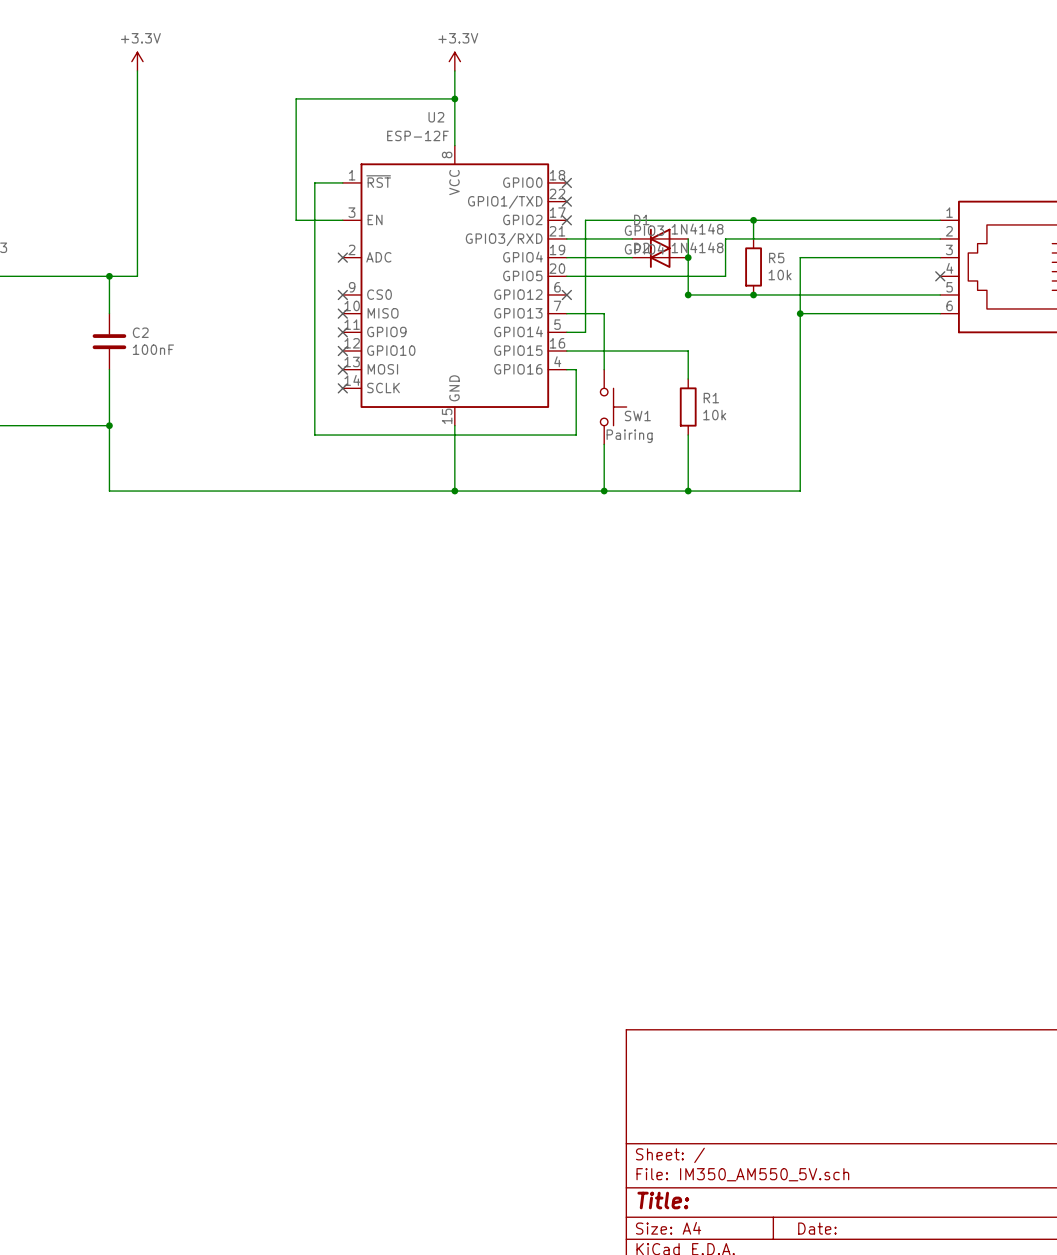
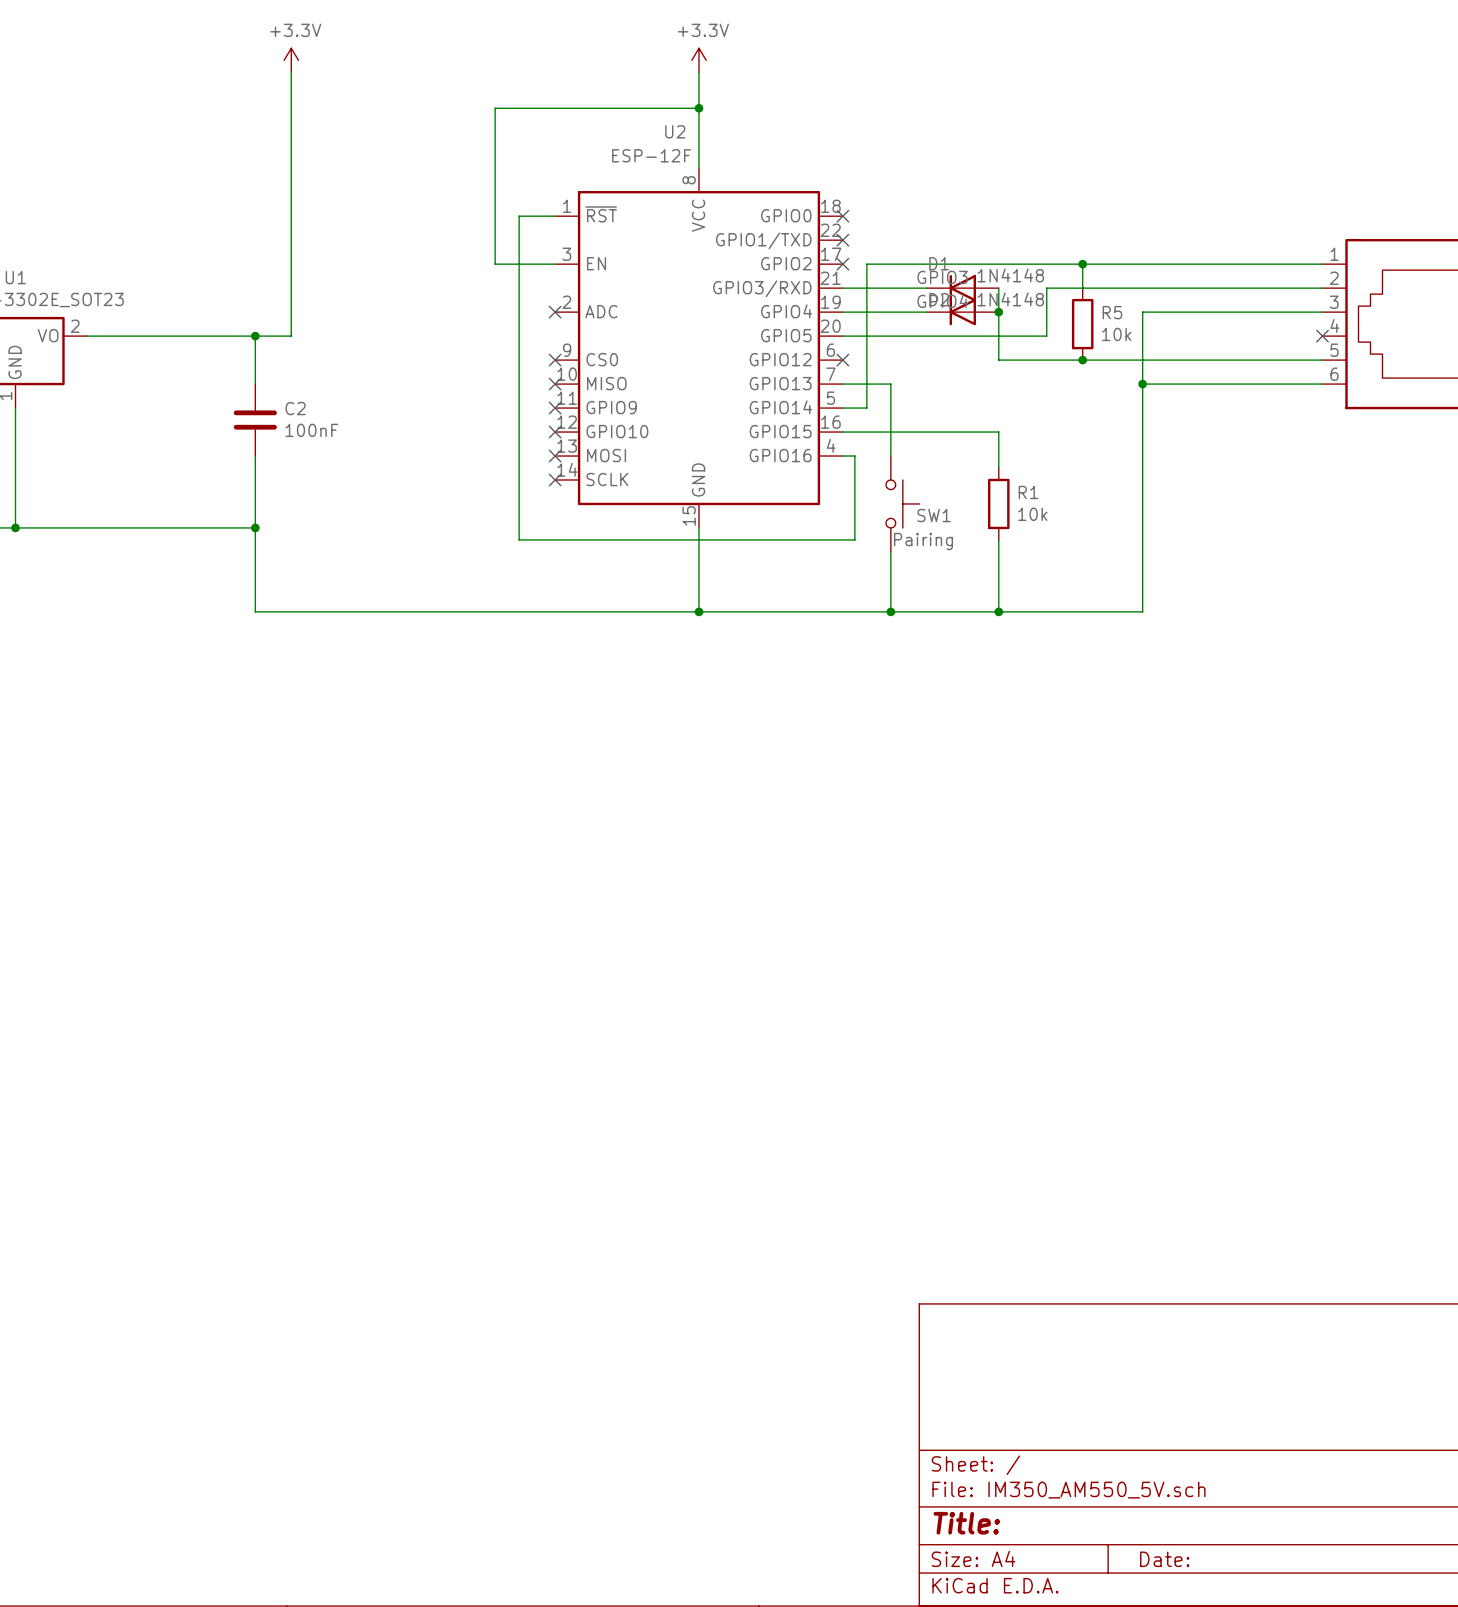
junction: (688, 294) -> none

